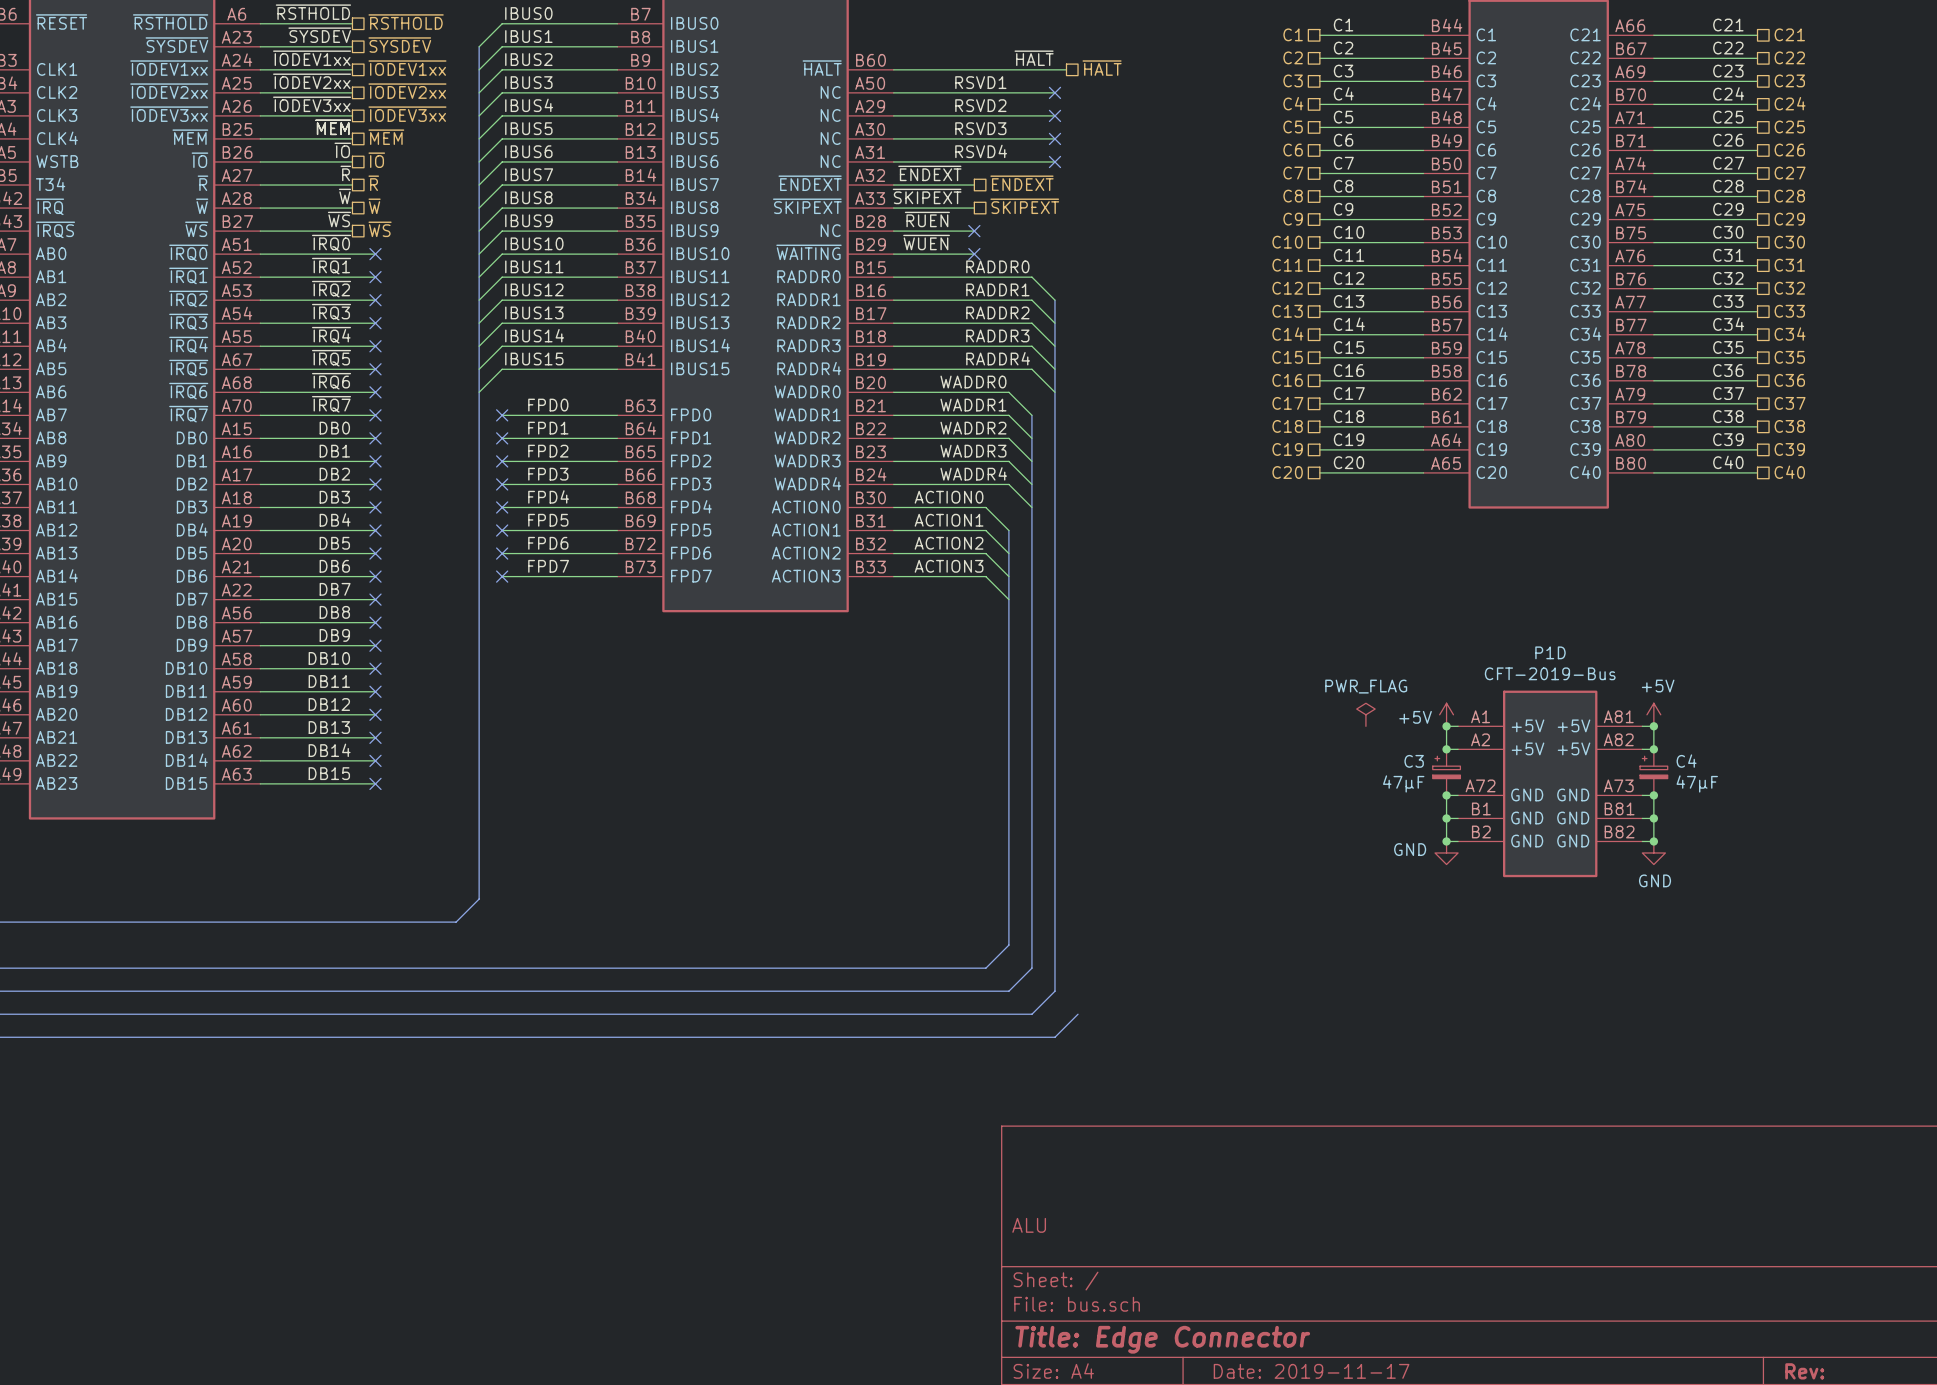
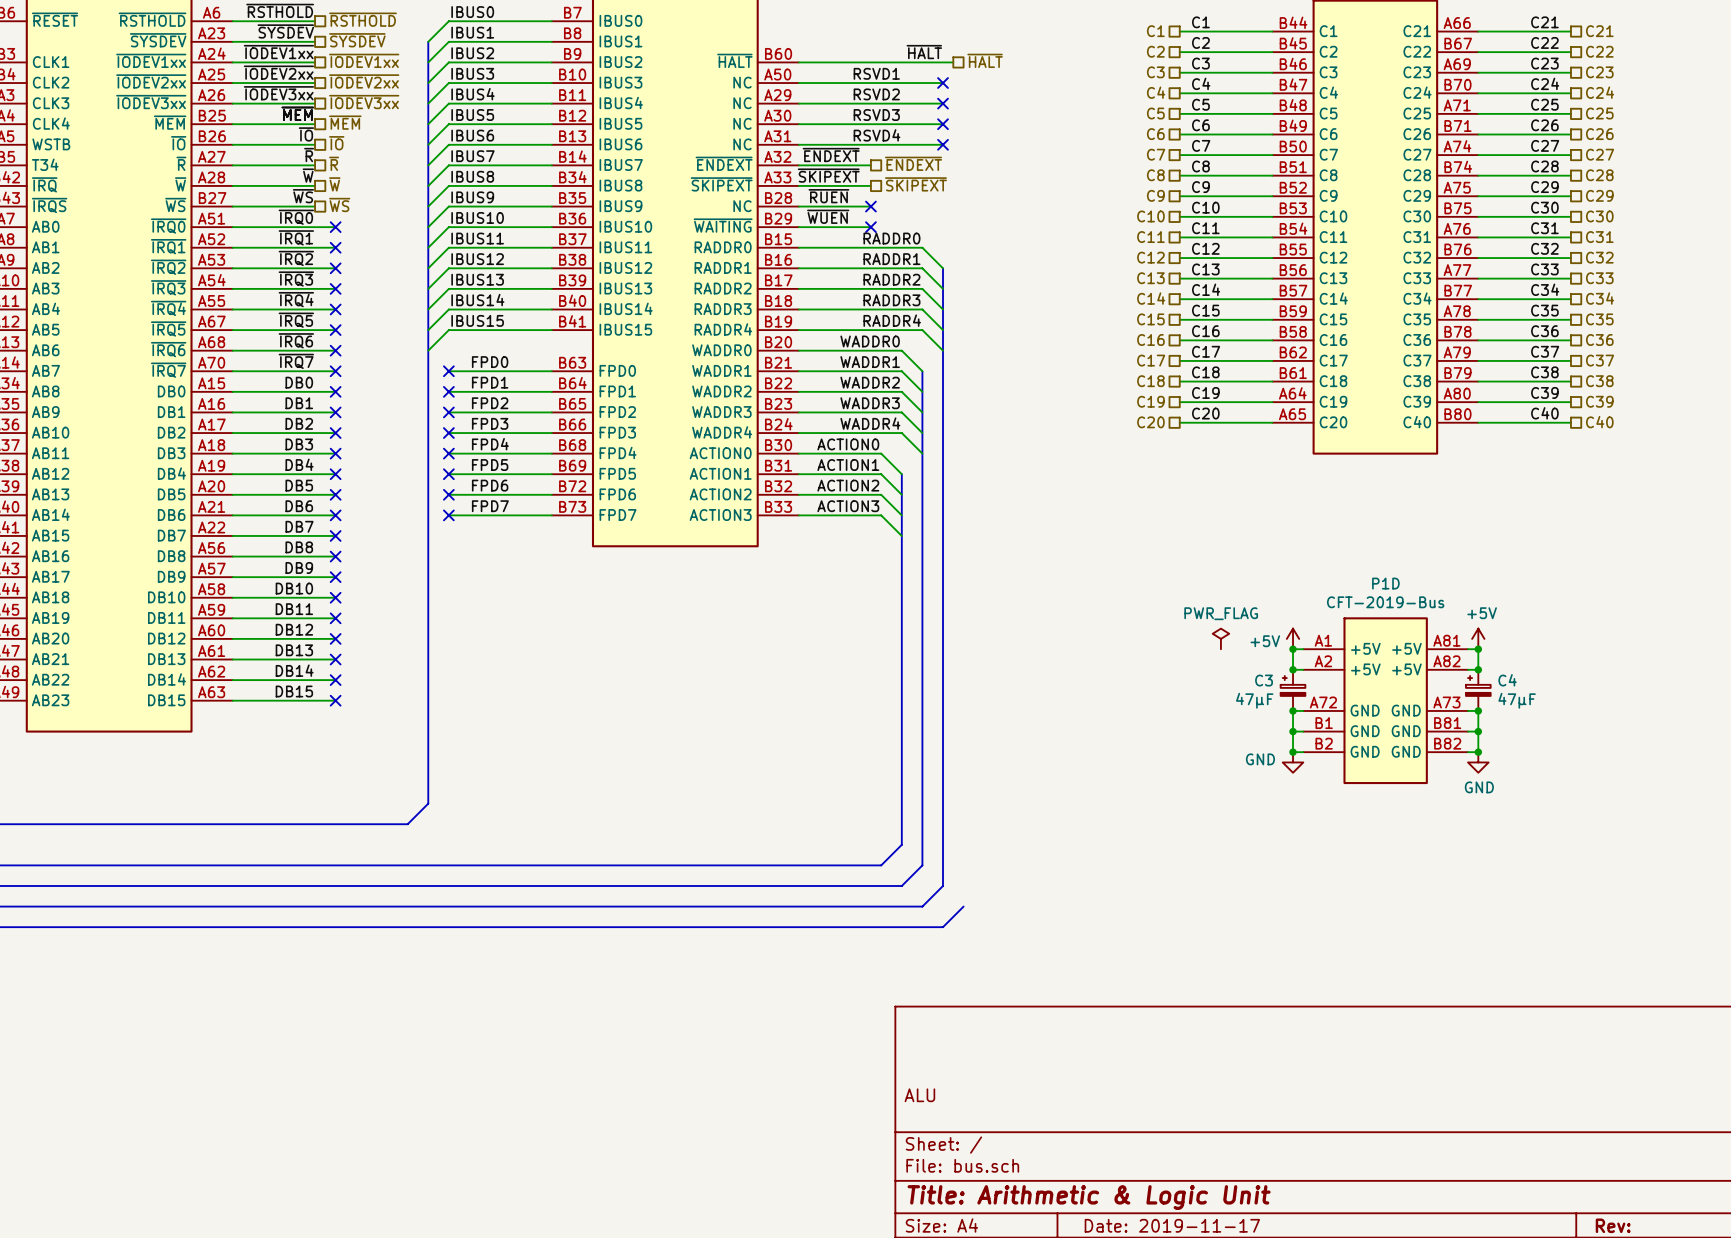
title block: Title: Edge Connector (1162, 1339) -> Title: Arithmetic & Logic Unit (1089, 1197)

